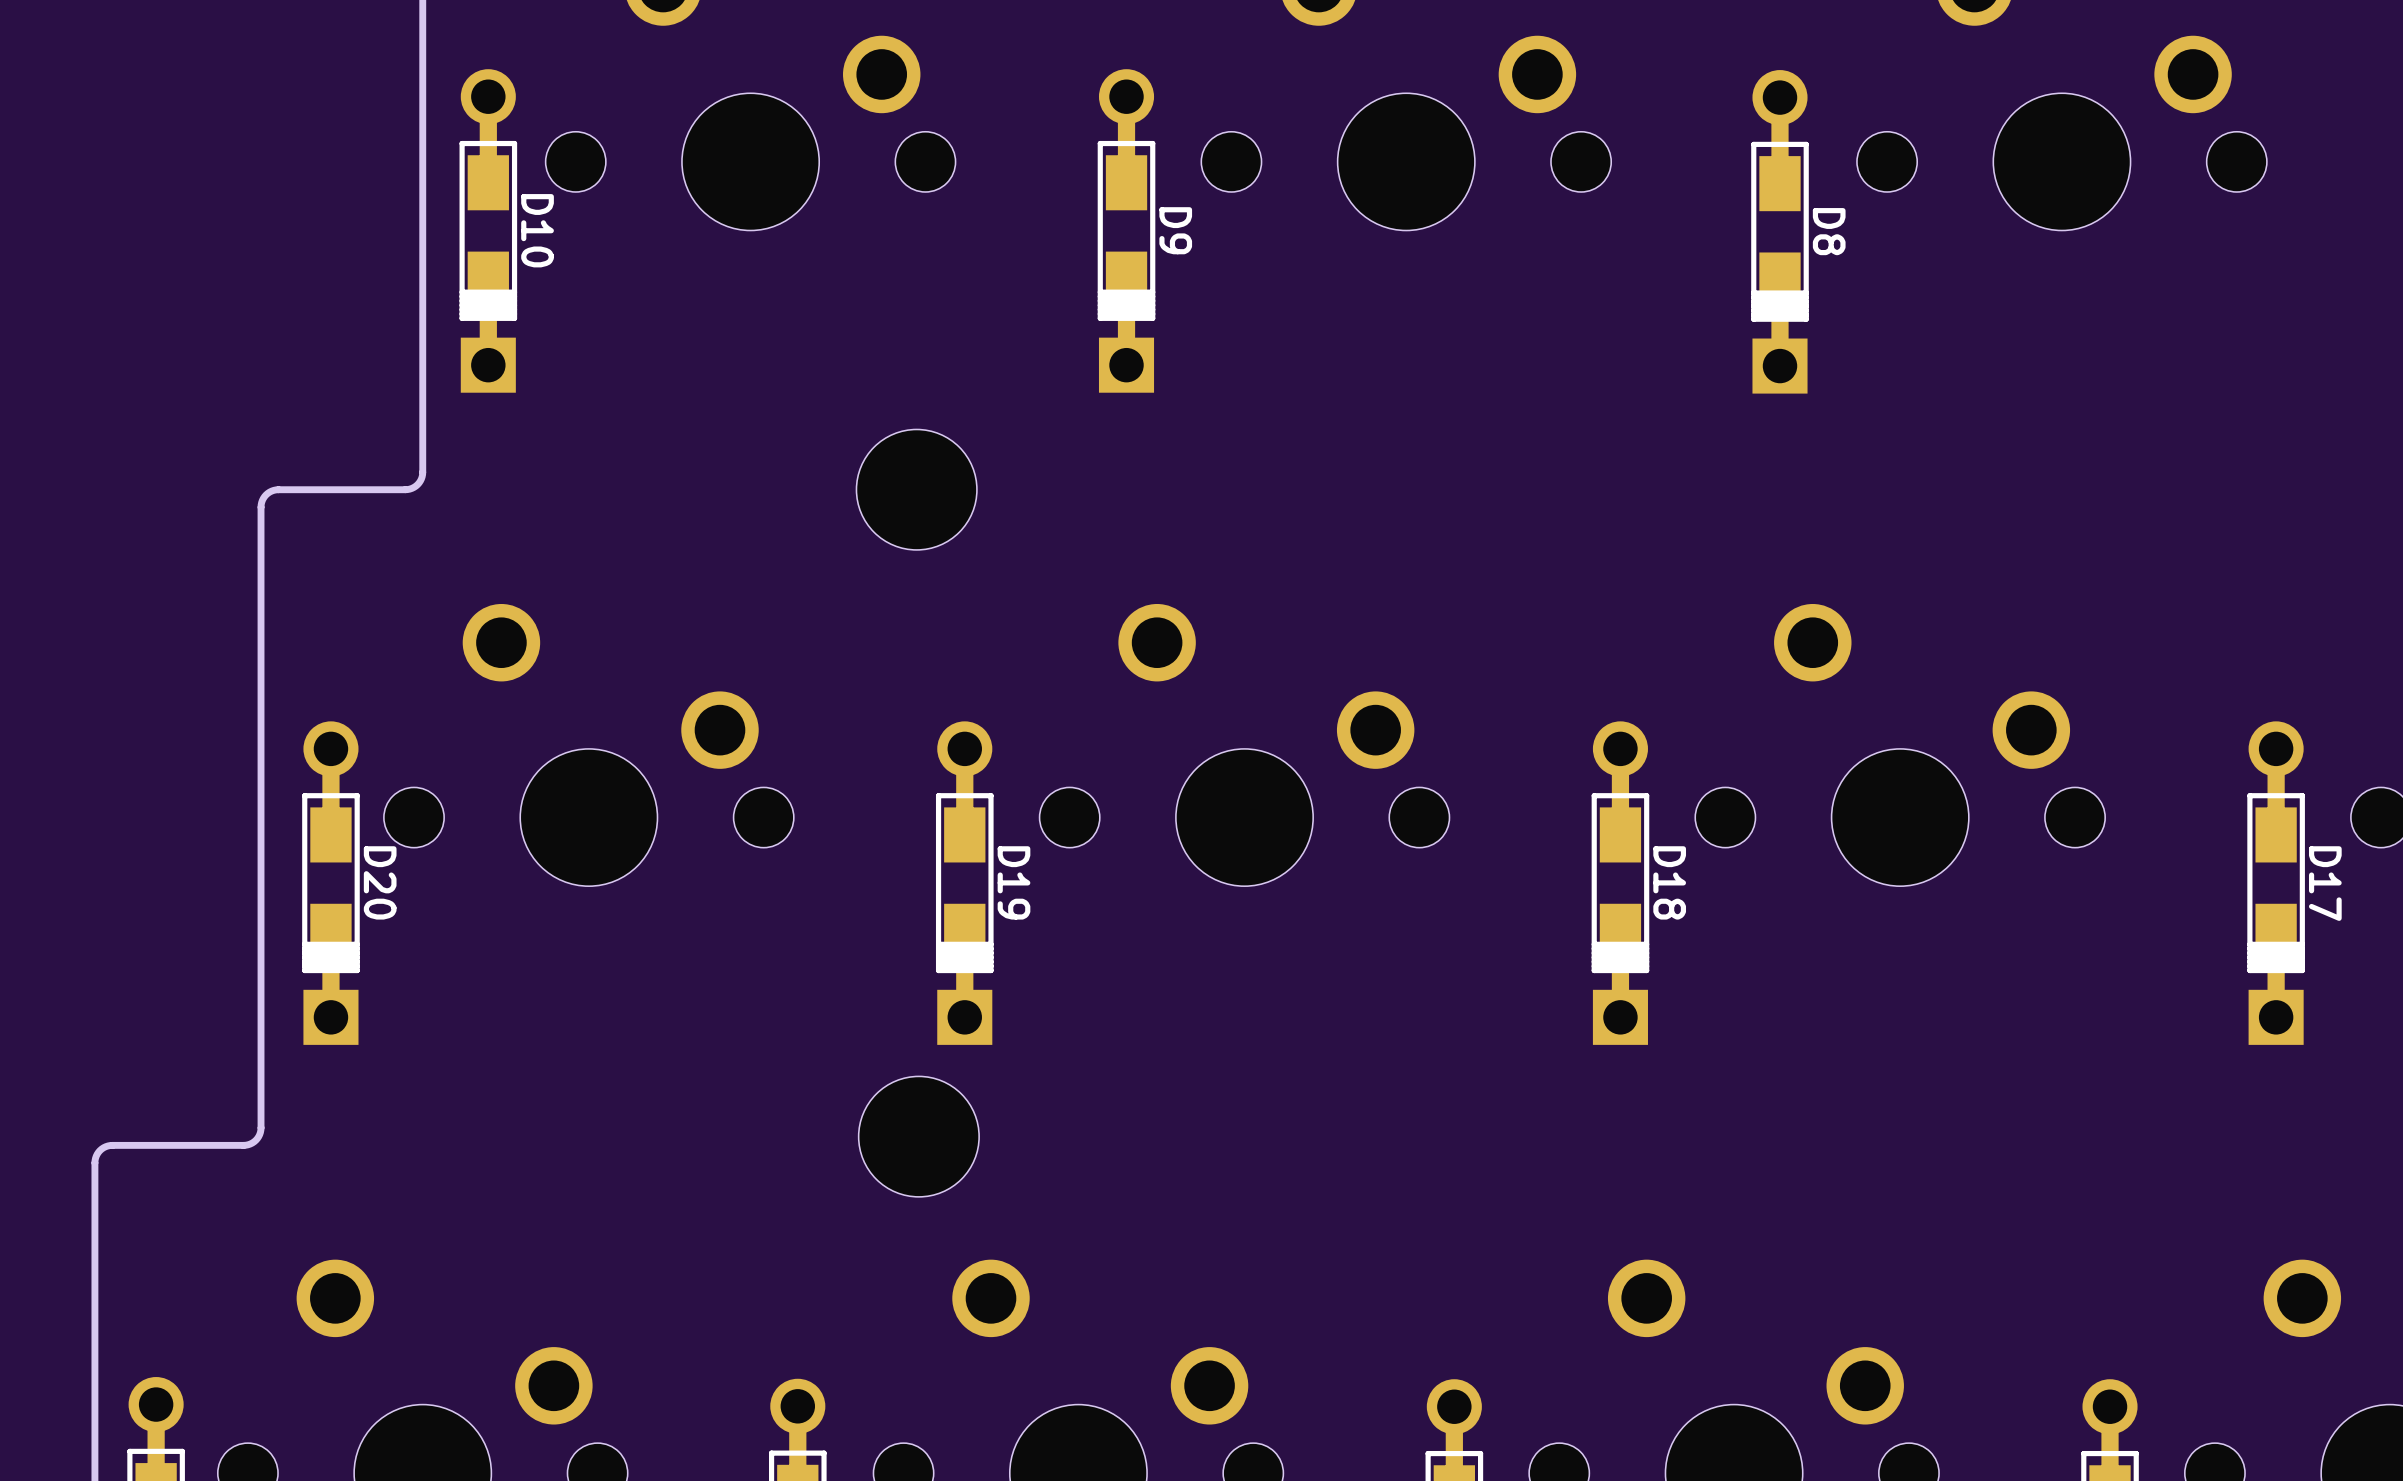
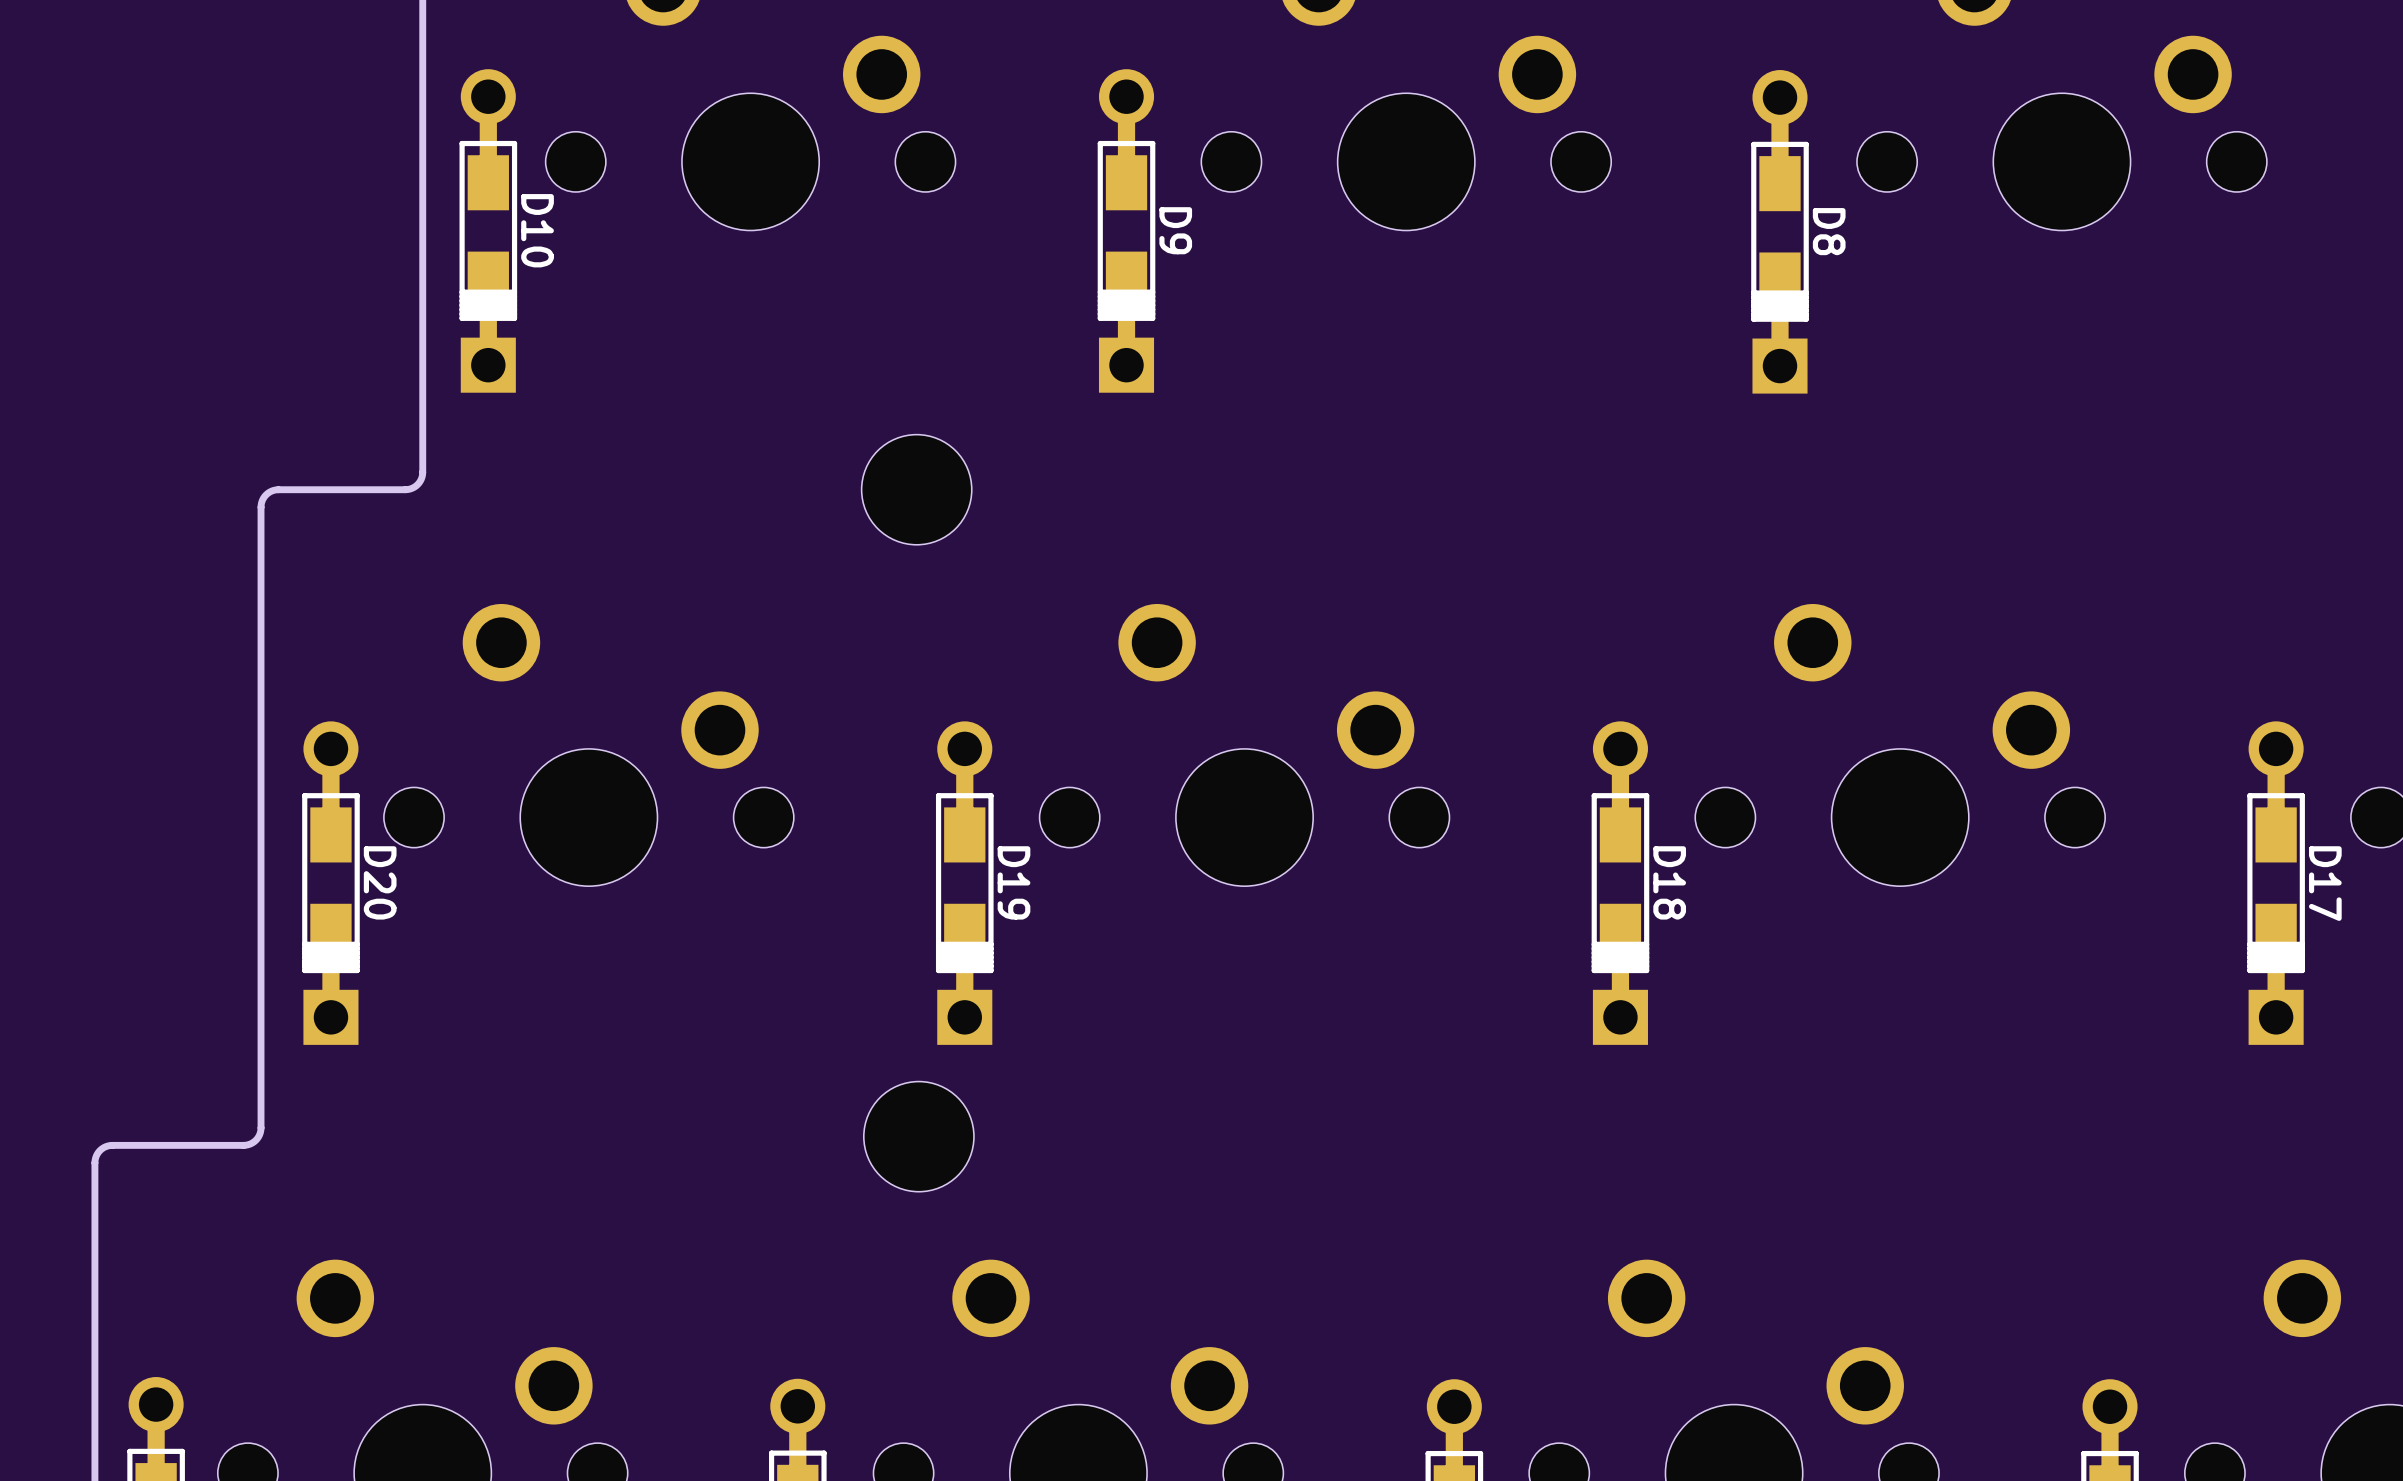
part footprint: [856, 429, 977, 550] -> [861, 434, 972, 545]
part footprint: [858, 1076, 980, 1197] -> [863, 1081, 974, 1192]

